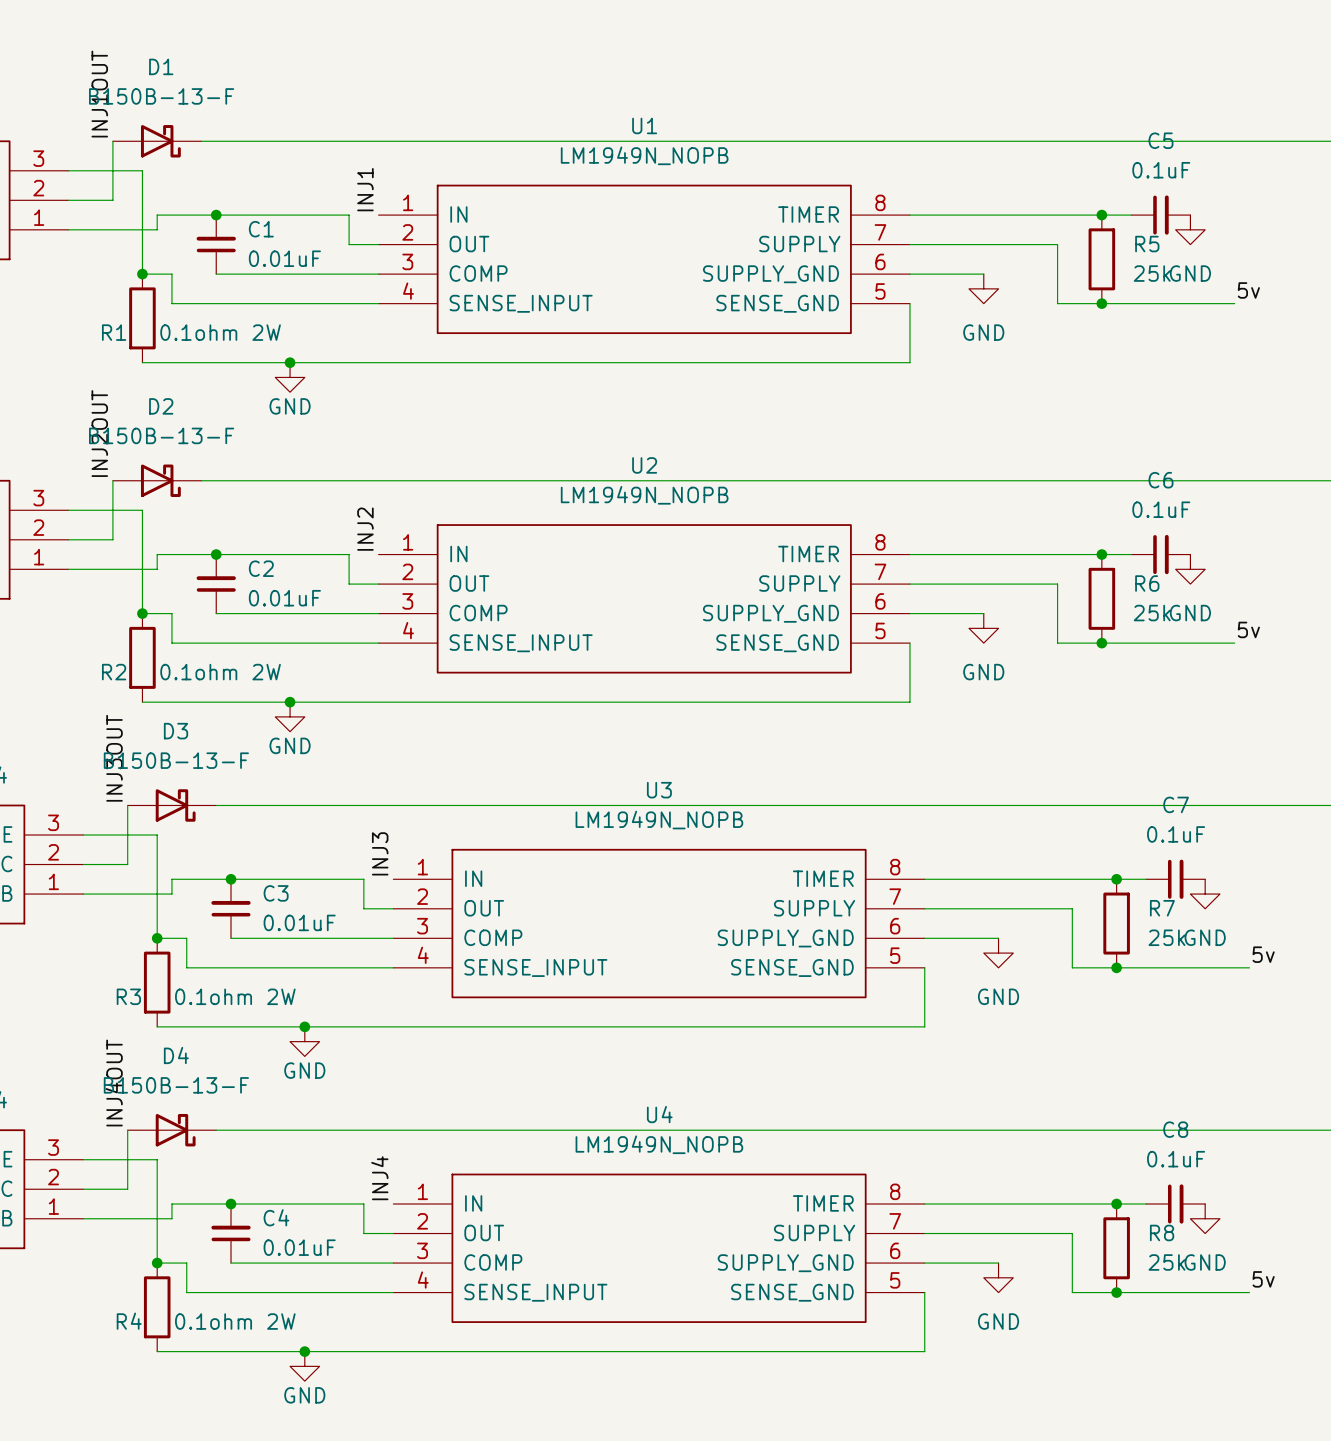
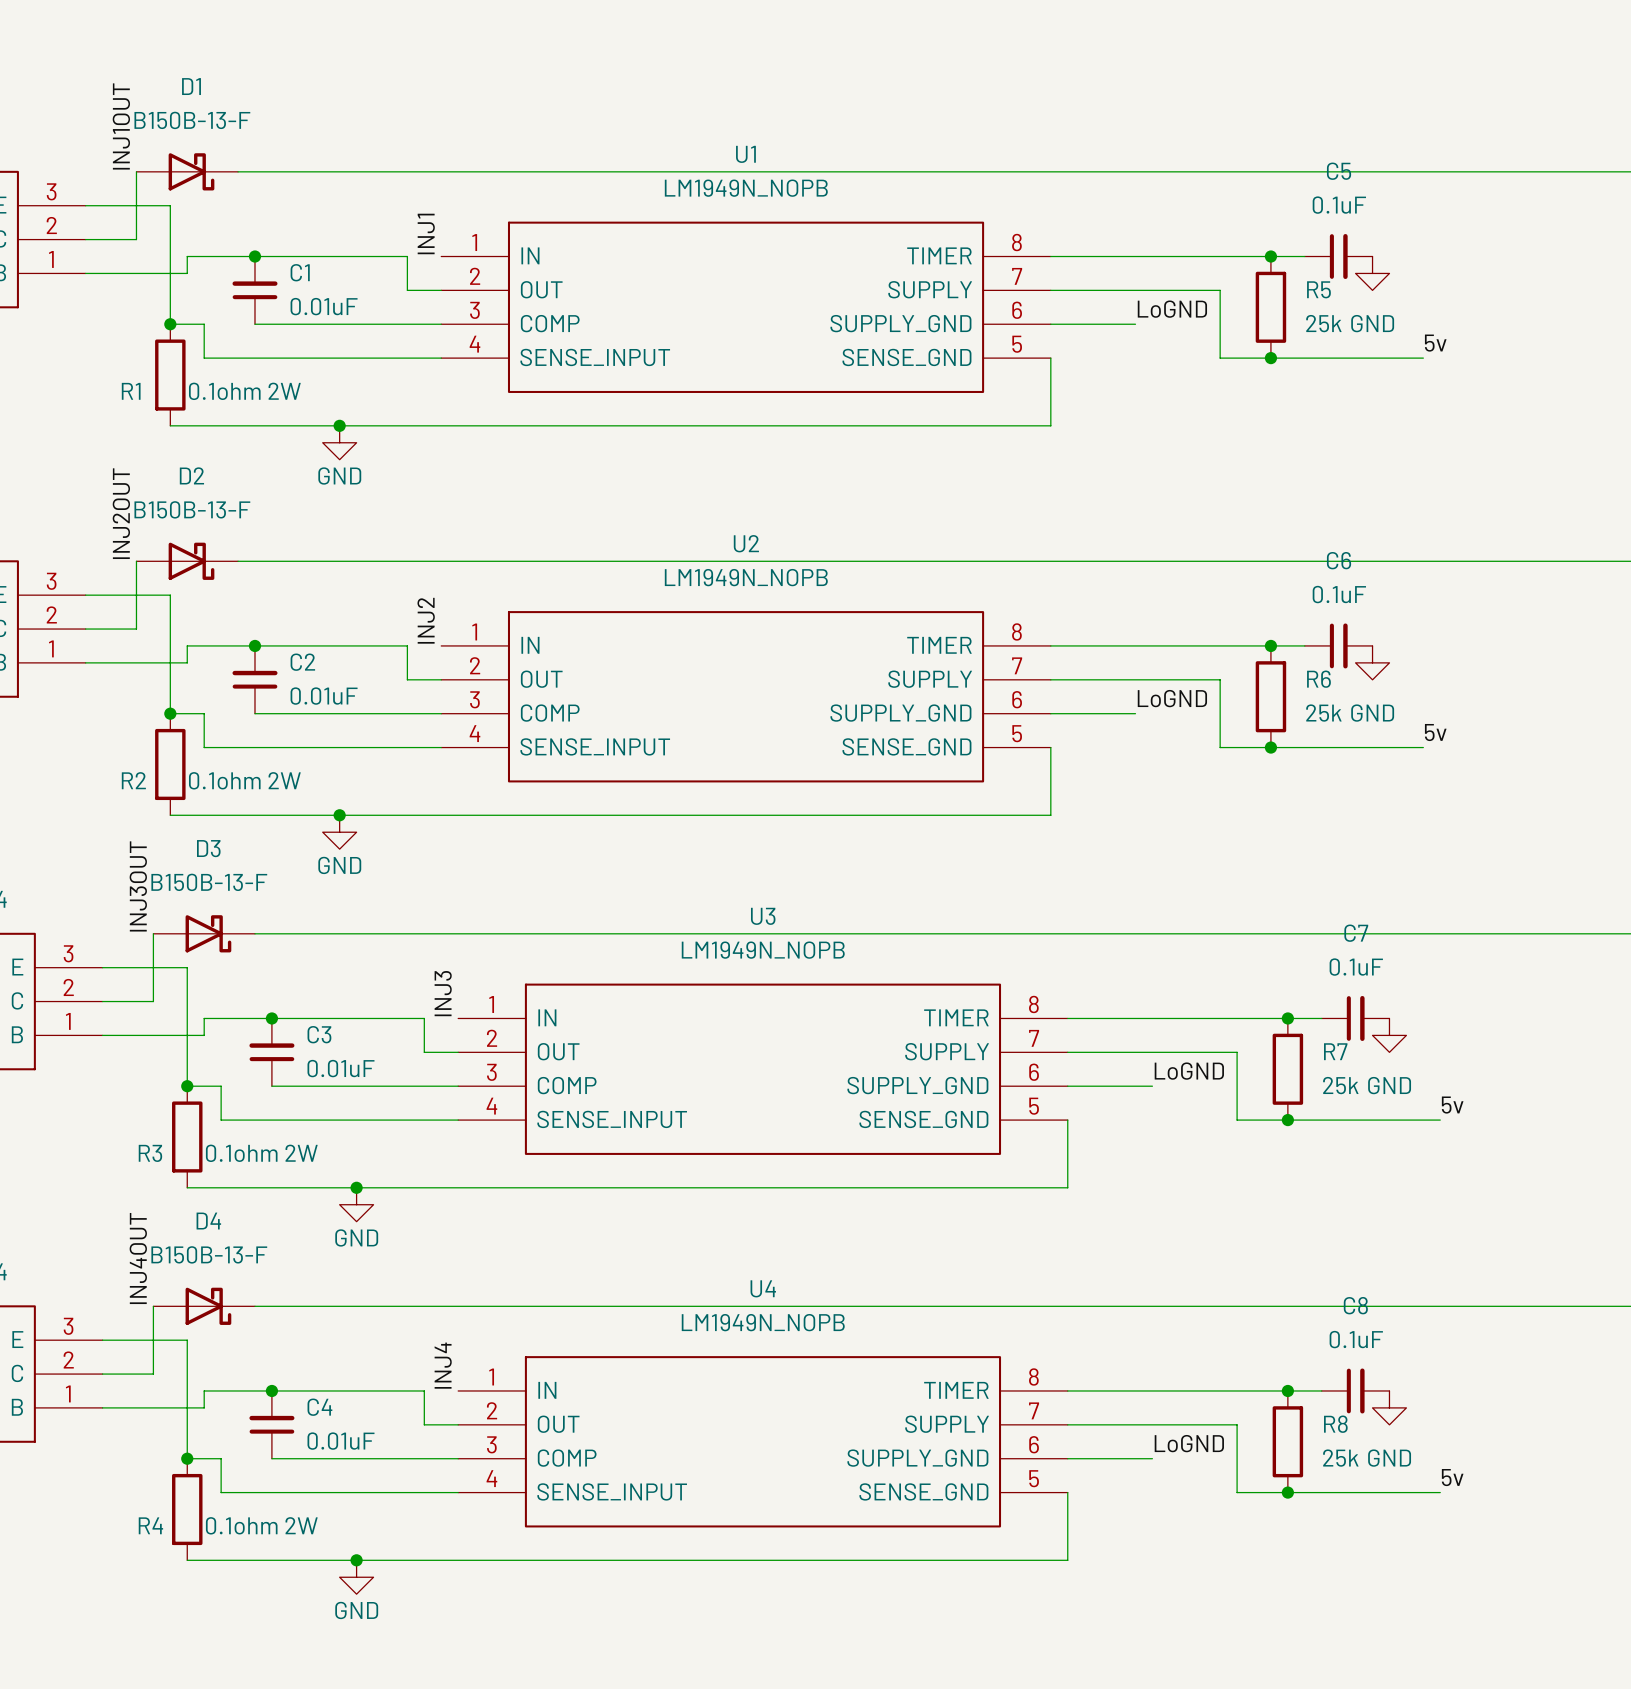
label: none -> LoGND (1172, 309)
power symbol: GND (983, 288) -> none
label: none -> LoGND (1172, 698)
power symbol: GND (983, 628) -> none
label: none -> LoGND (1189, 1071)
power symbol: GND (998, 953) -> none
label: none -> LoGND (1189, 1443)
power symbol: GND (998, 1277) -> none

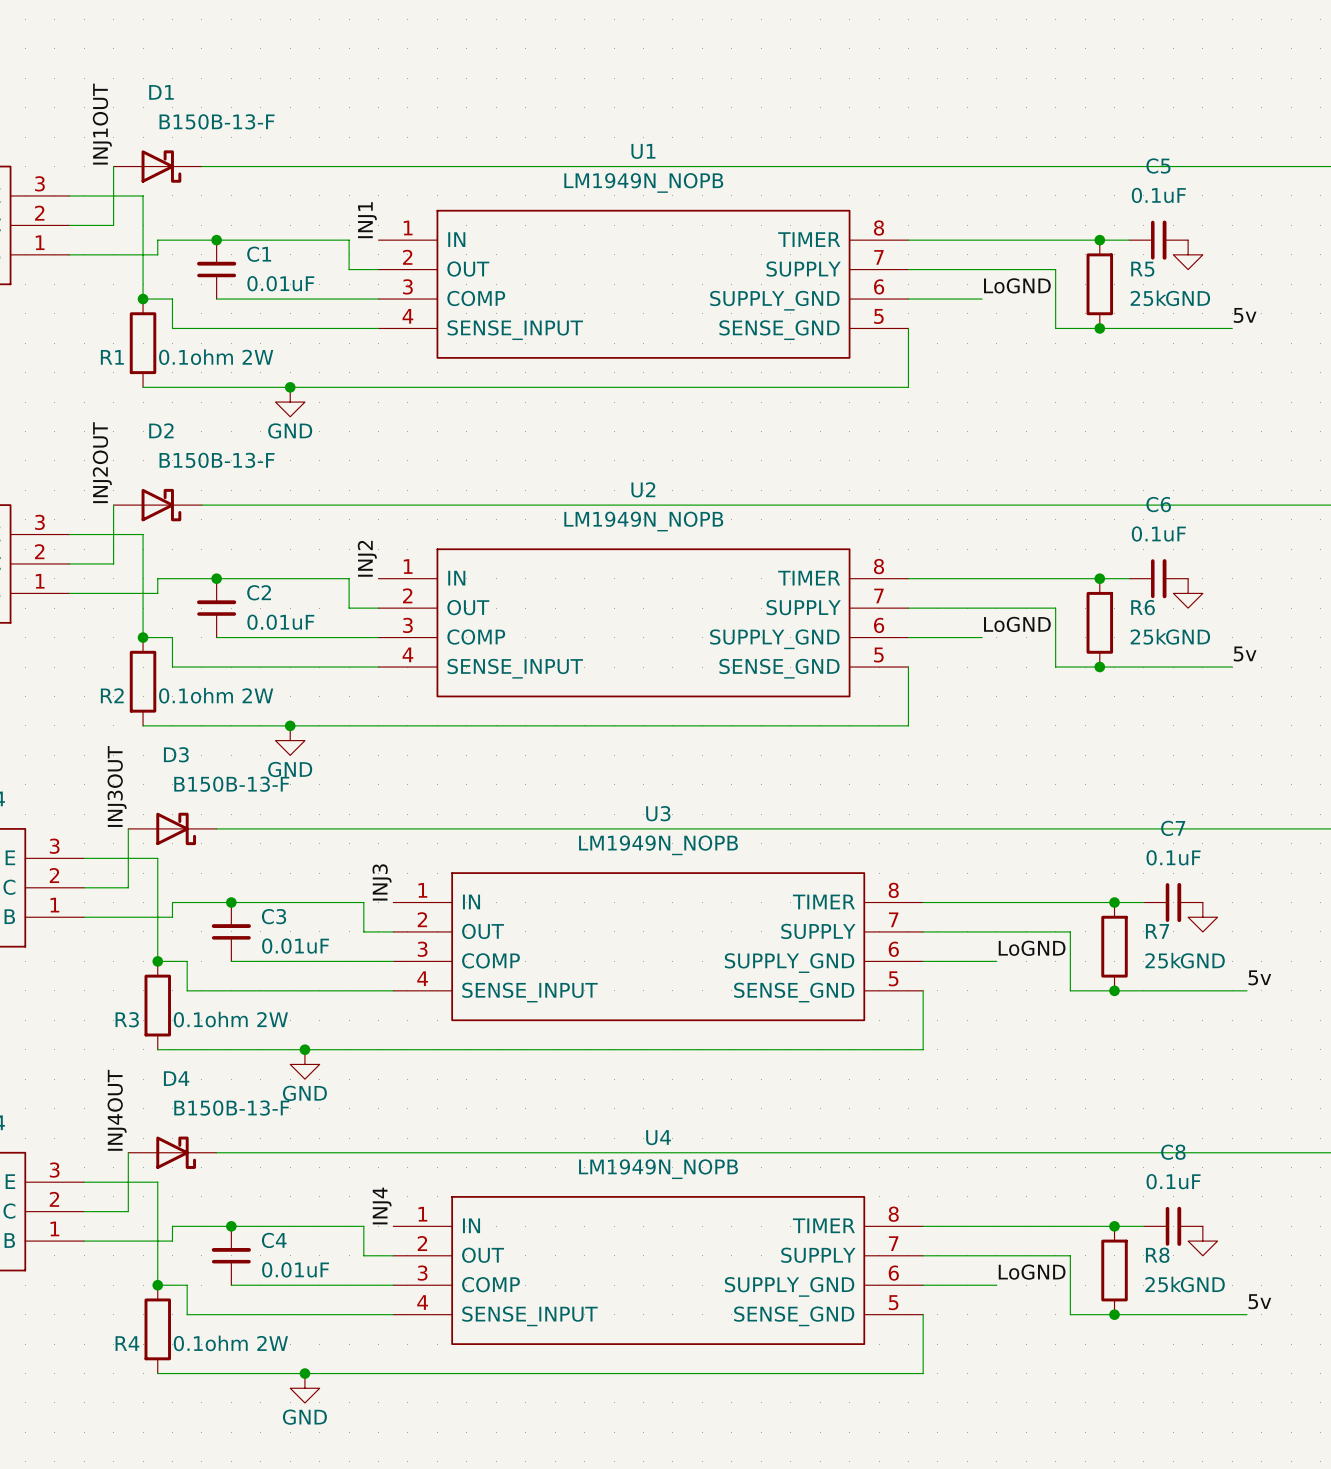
D1 value position: B150B-13-F (192, 120) -> B150B-13-F (217, 121)
D2 value position: B150B-13-F (192, 509) -> B150B-13-F (217, 460)
D3 value position: B150B-13-F (209, 882) -> B150B-13-F (231, 784)
D4 value position: B150B-13-F (209, 1254) -> B150B-13-F (231, 1108)

